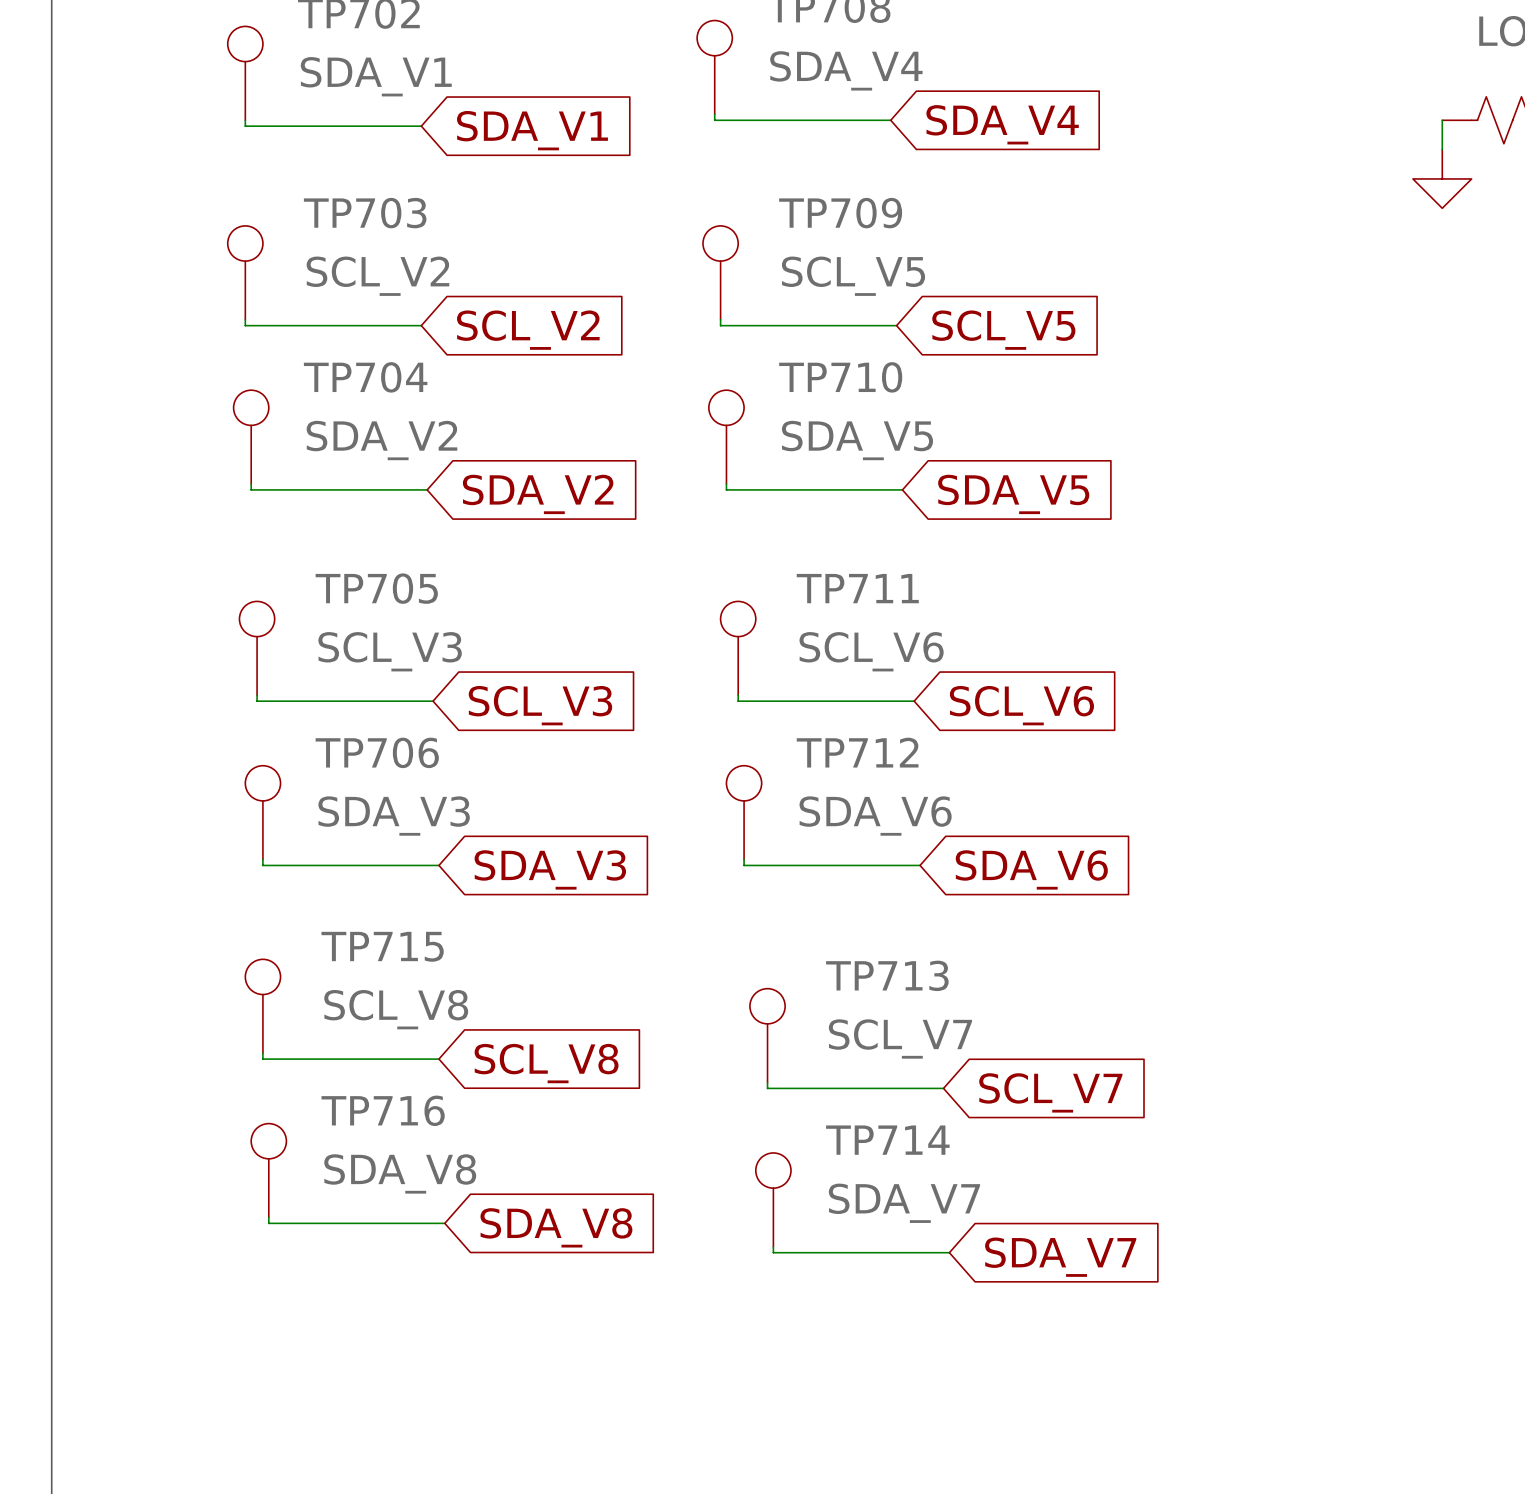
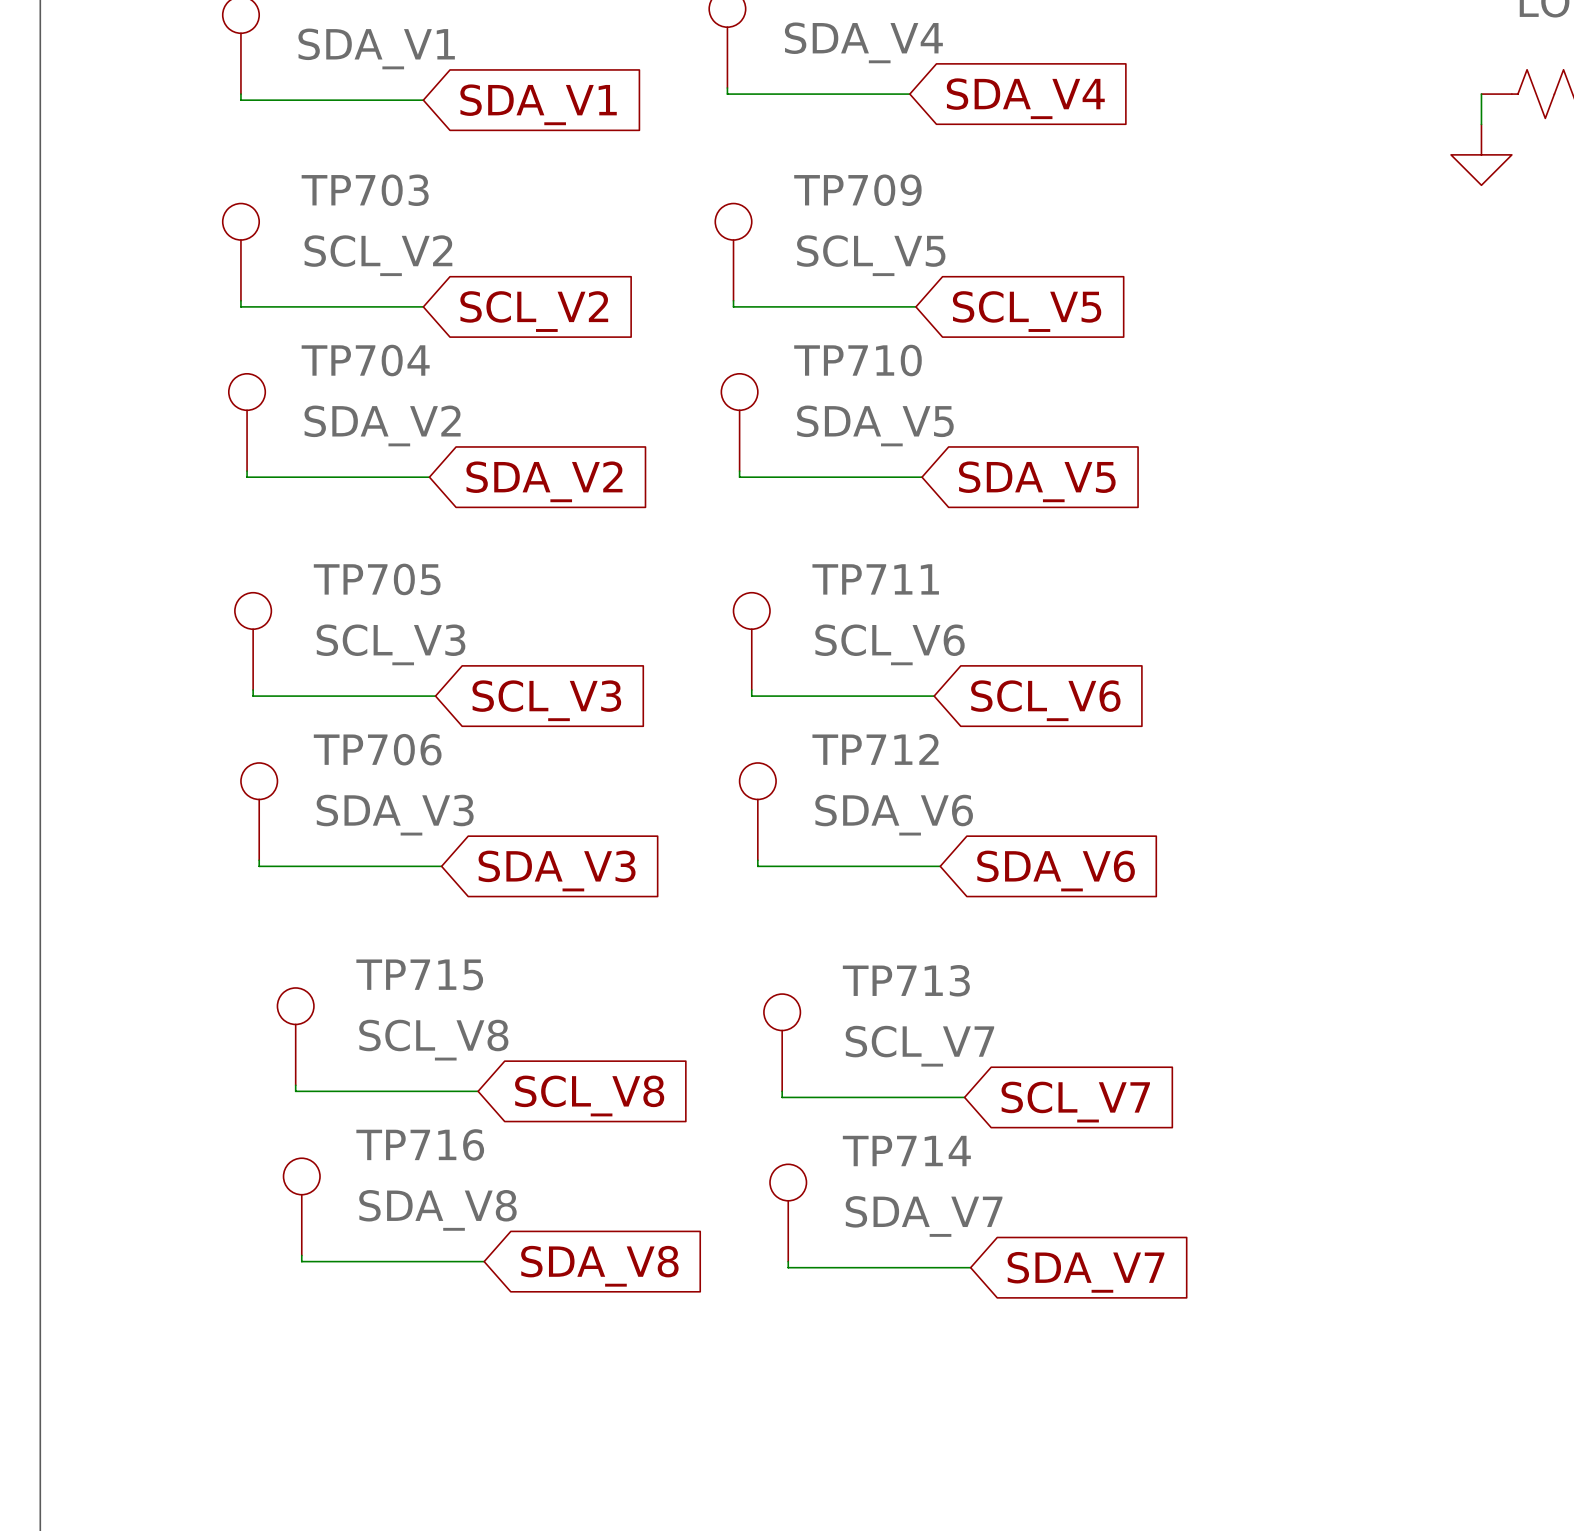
TP715 position: (262, 1006) -> (295, 1036)
wire: (262, 1053) (262, 1059) (438, 1059) -> (295, 1085) (295, 1091) (478, 1091)
global label position: SCL_V8 (546, 1063) -> SCL_V8 (589, 1095)
TP716 position: (268, 1170) -> (301, 1206)
wire: (268, 1217) (268, 1223) (444, 1223) -> (301, 1255) (301, 1261) (484, 1261)
global label position: SDA_V8 (556, 1227) -> SDA_V8 (599, 1266)

